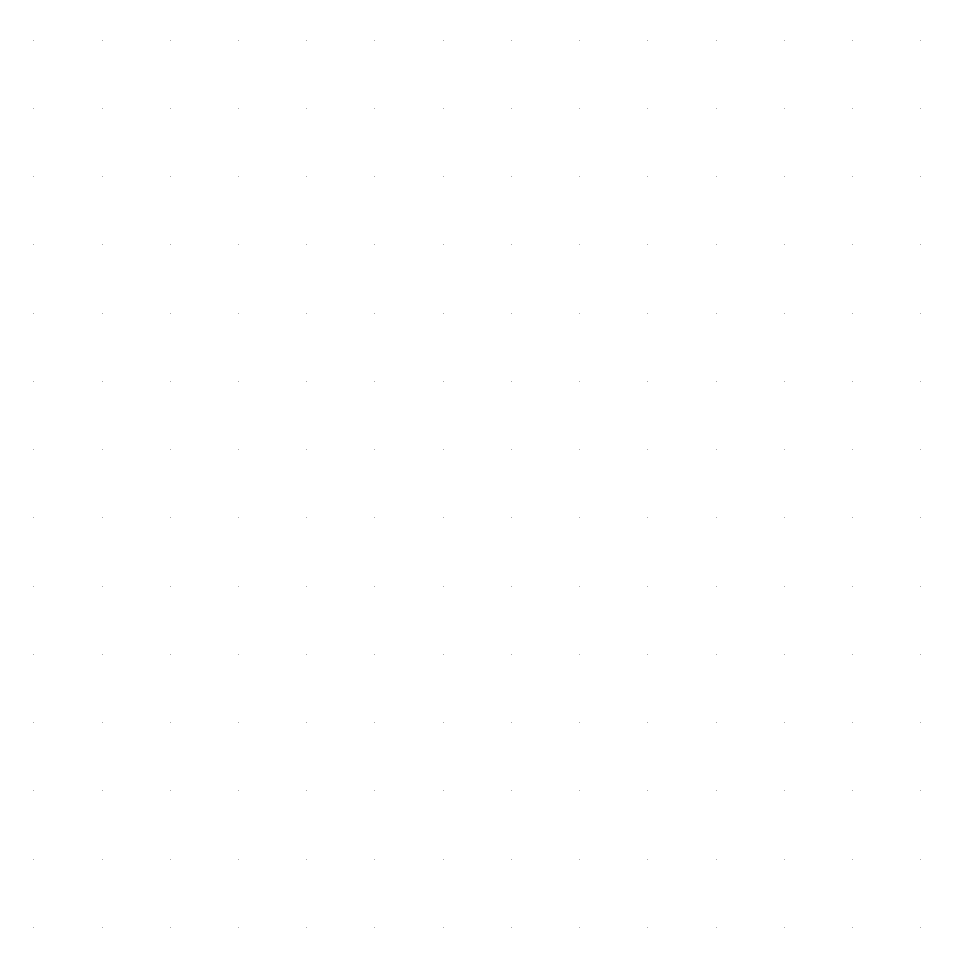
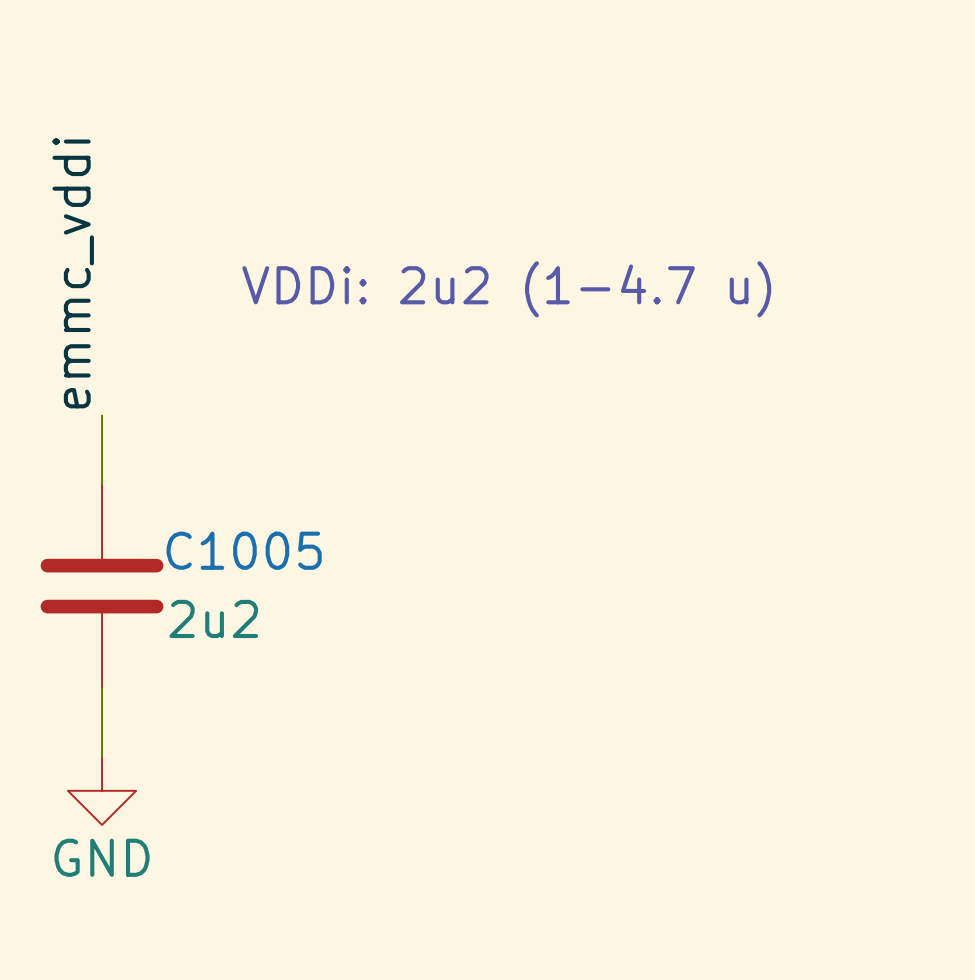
label: none -> emmc_vddi (73, 273)
text: none -> VDDi: 2u2 (1-4.7 u) (506, 289)
wire: none -> (102, 415) (102, 483)
C1005: none -> 2u2 (102, 586)
wire: none -> (102, 688) (102, 756)
power symbol: none -> GND (102, 790)

